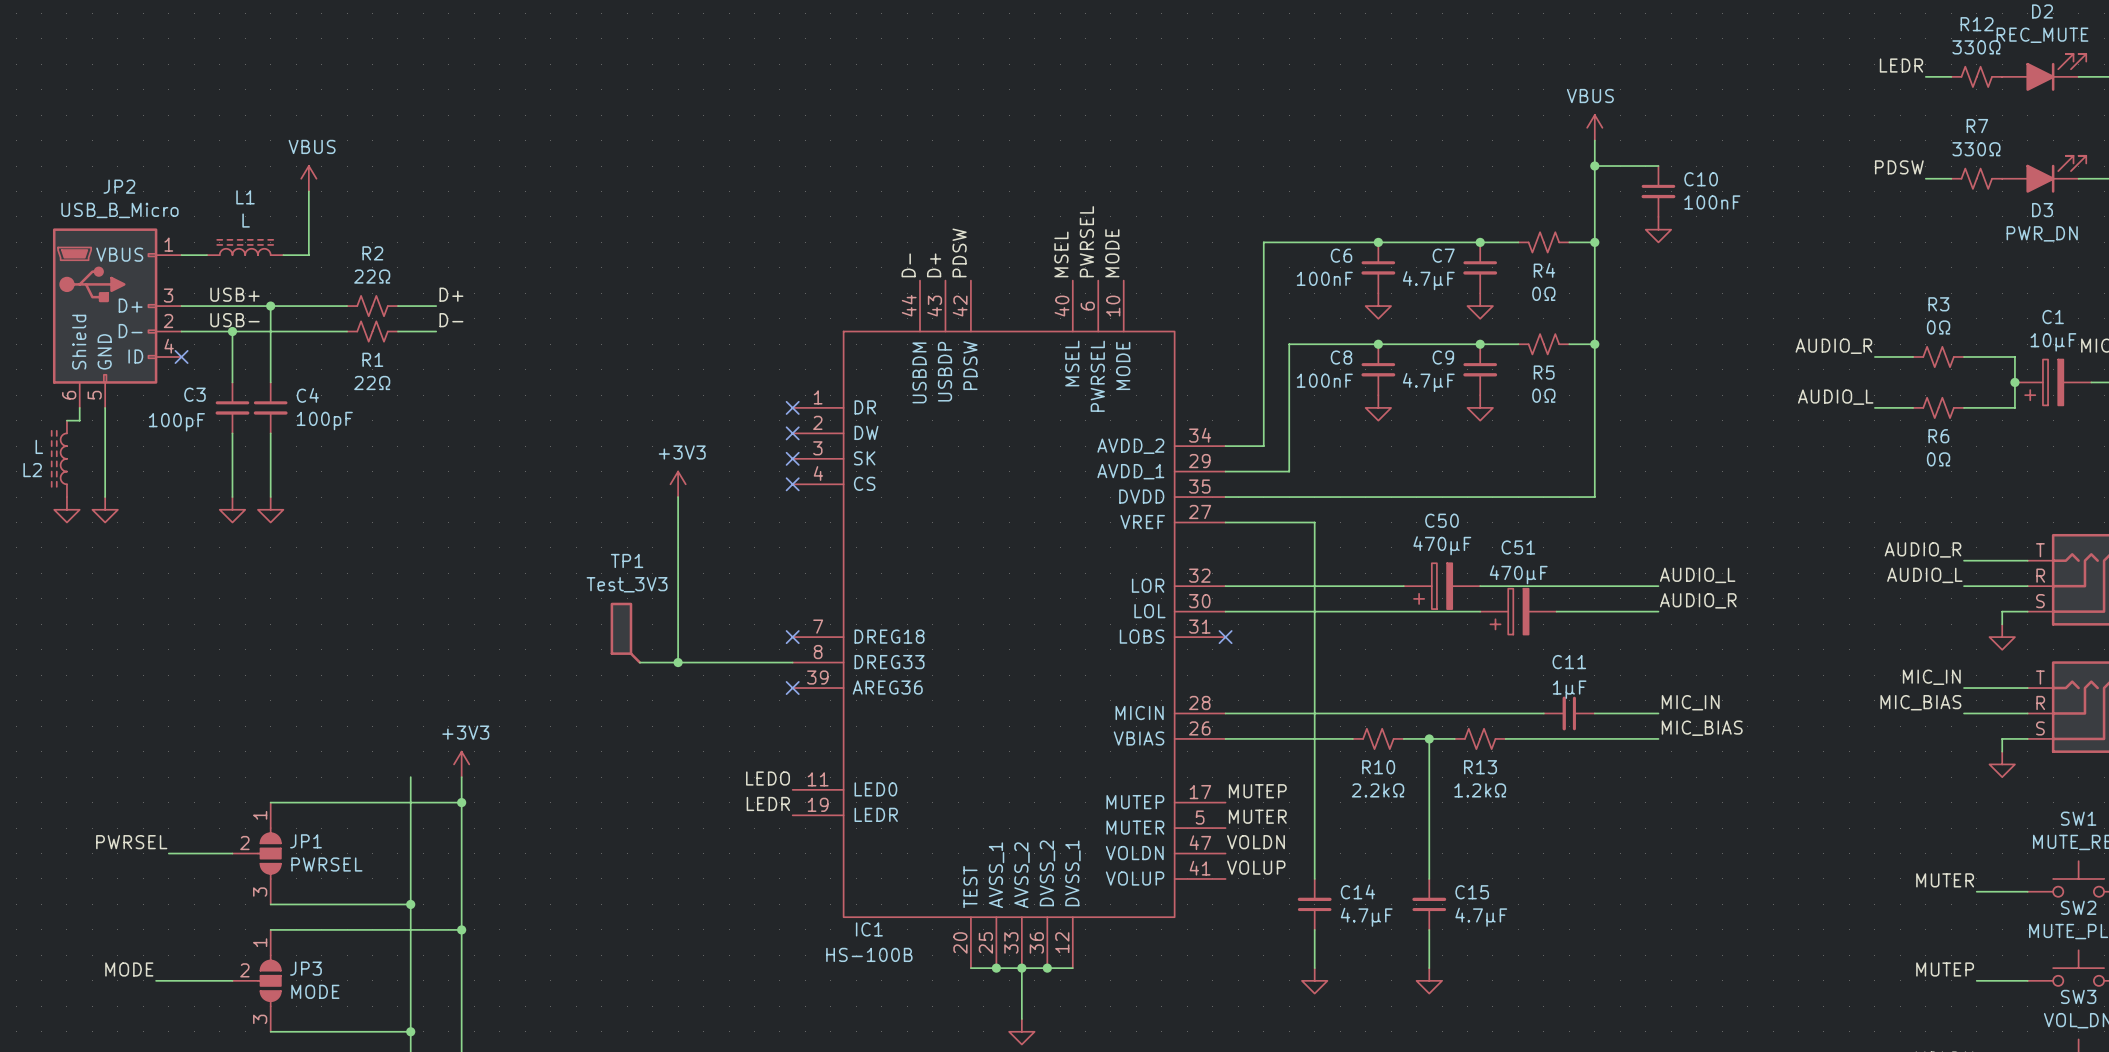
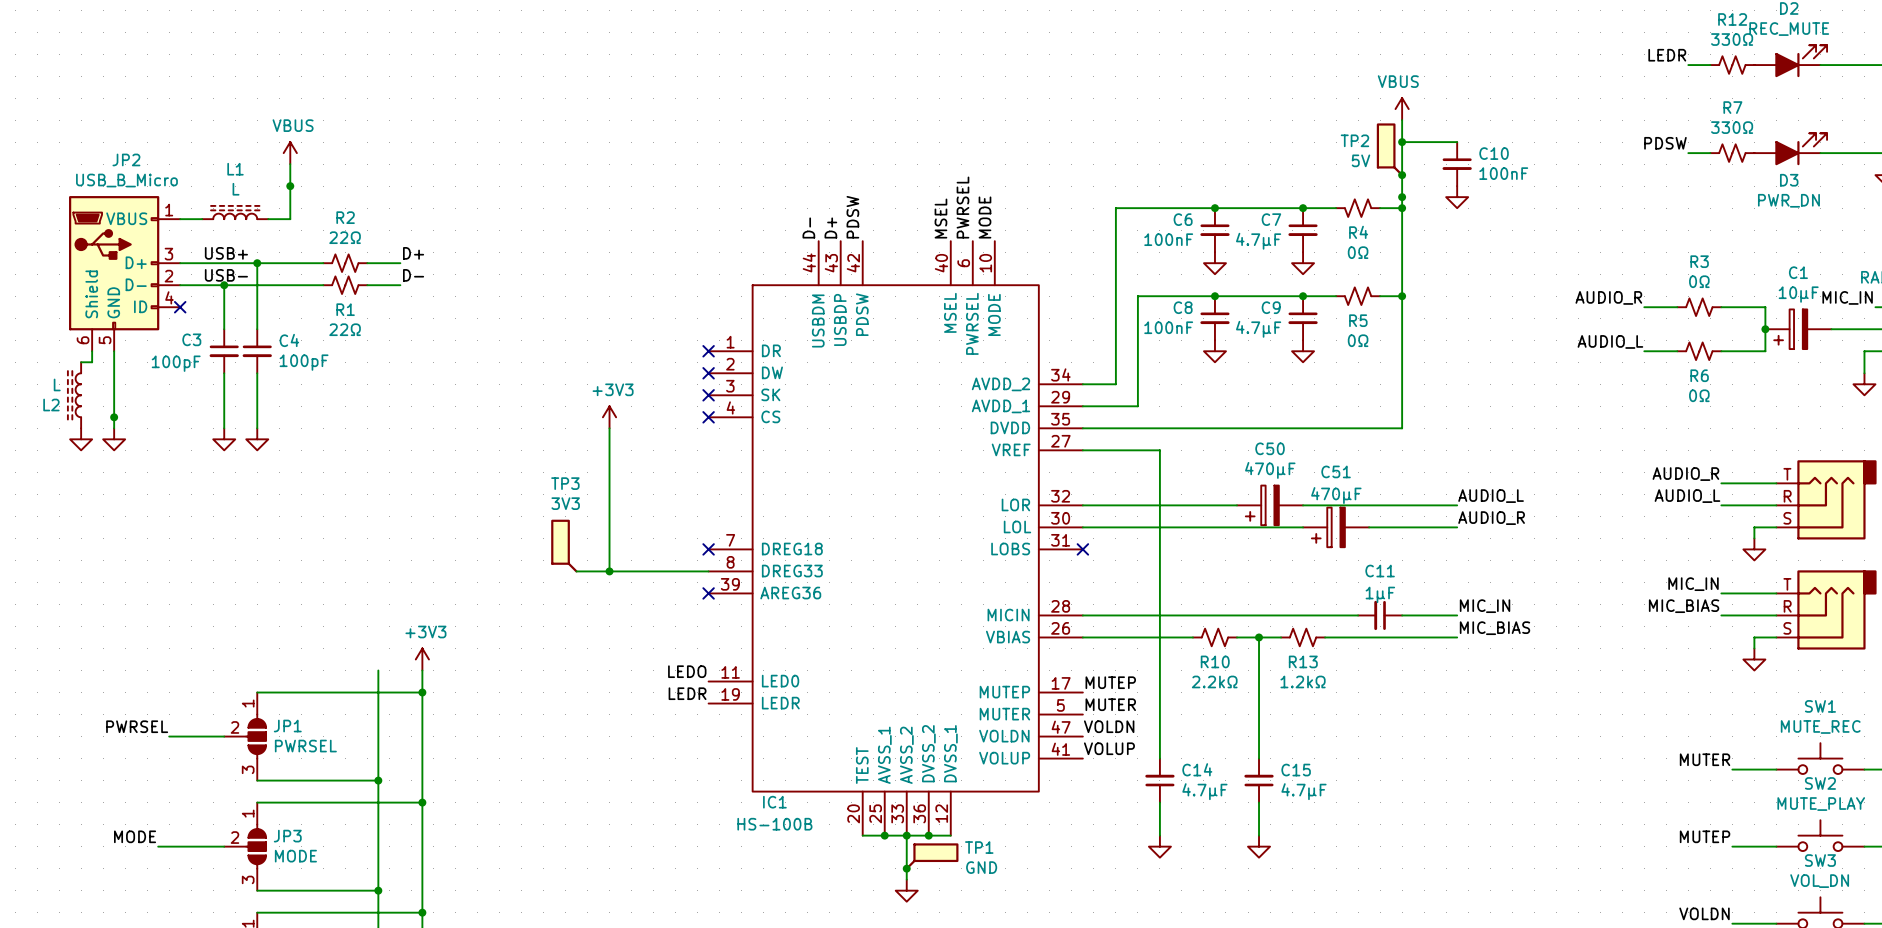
TP2: none -> 5V (1390, 149)
junction: none -> (1402, 175)
junction: none -> (290, 186)
junction: none -> (1402, 197)
junction: none -> (114, 417)
TP1 name: TP1 (627, 560) -> TP3 (565, 483)
TP1 value: Test_3V3 (627, 584) -> 3V3 (565, 503)
TP1: none -> GND (932, 856)
junction: none -> (906, 868)

